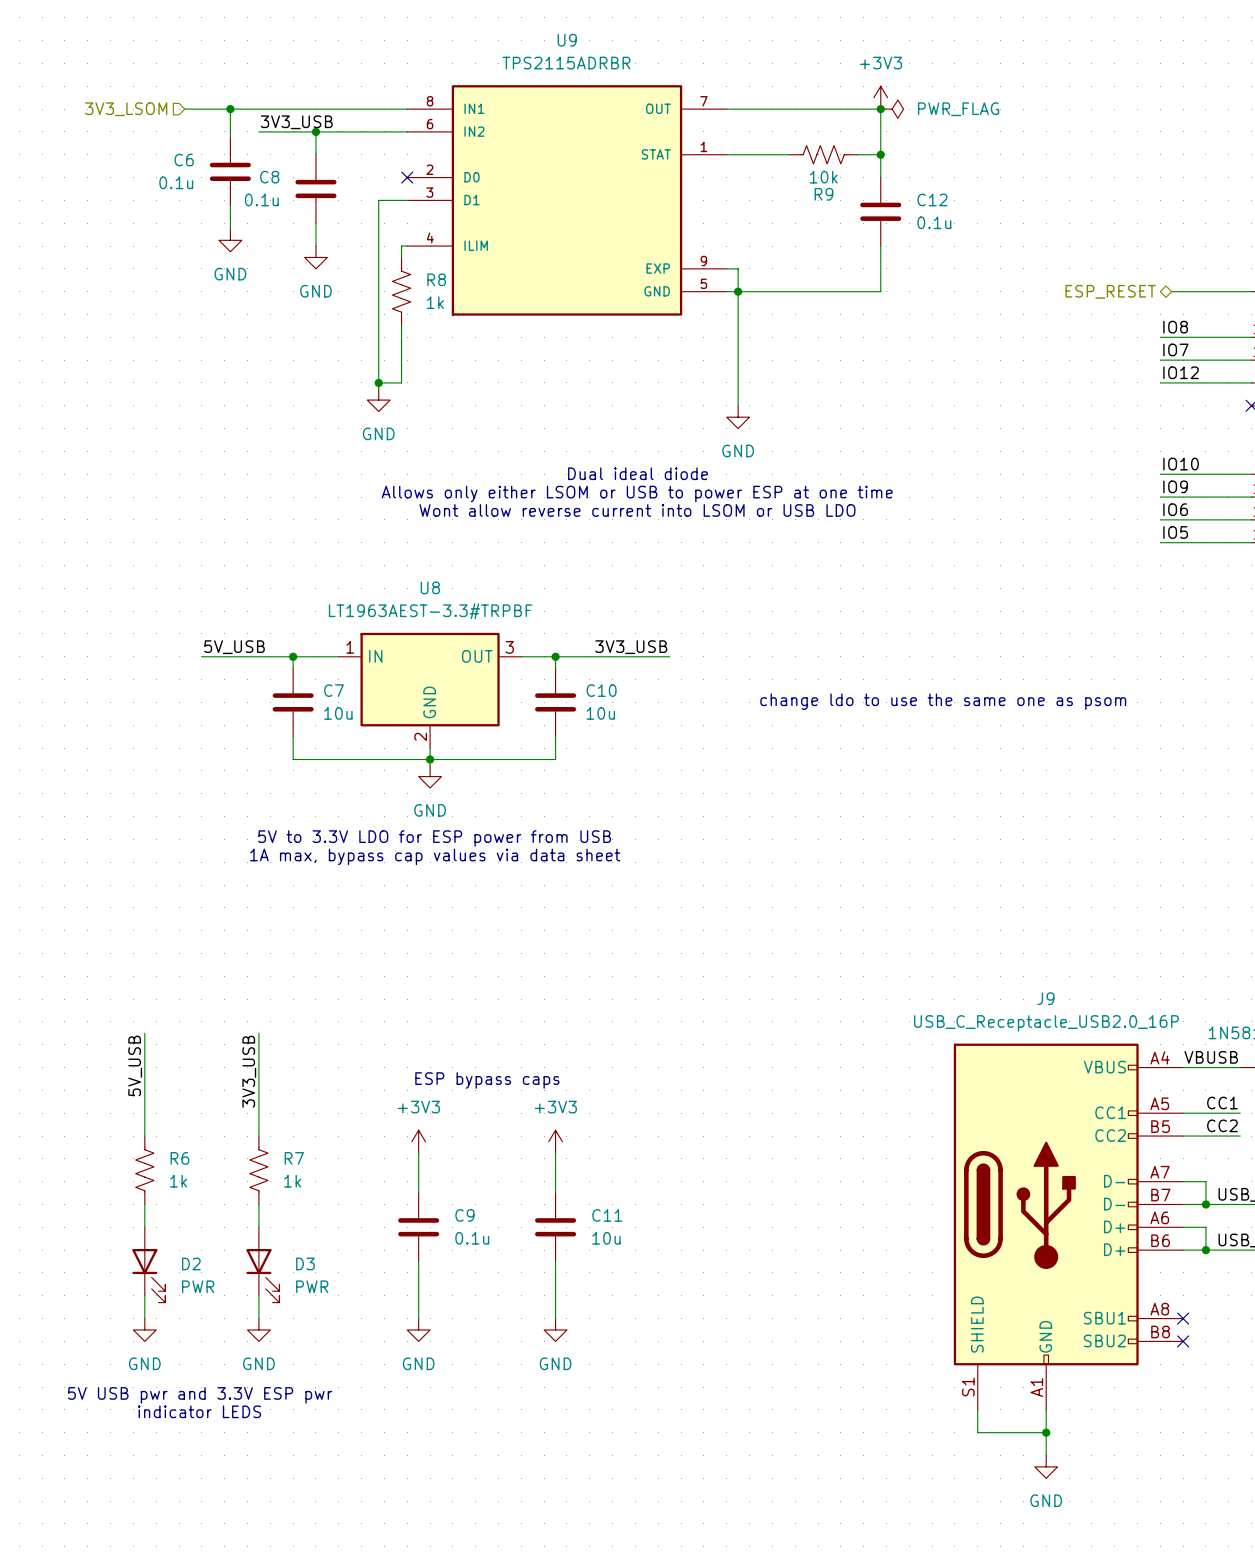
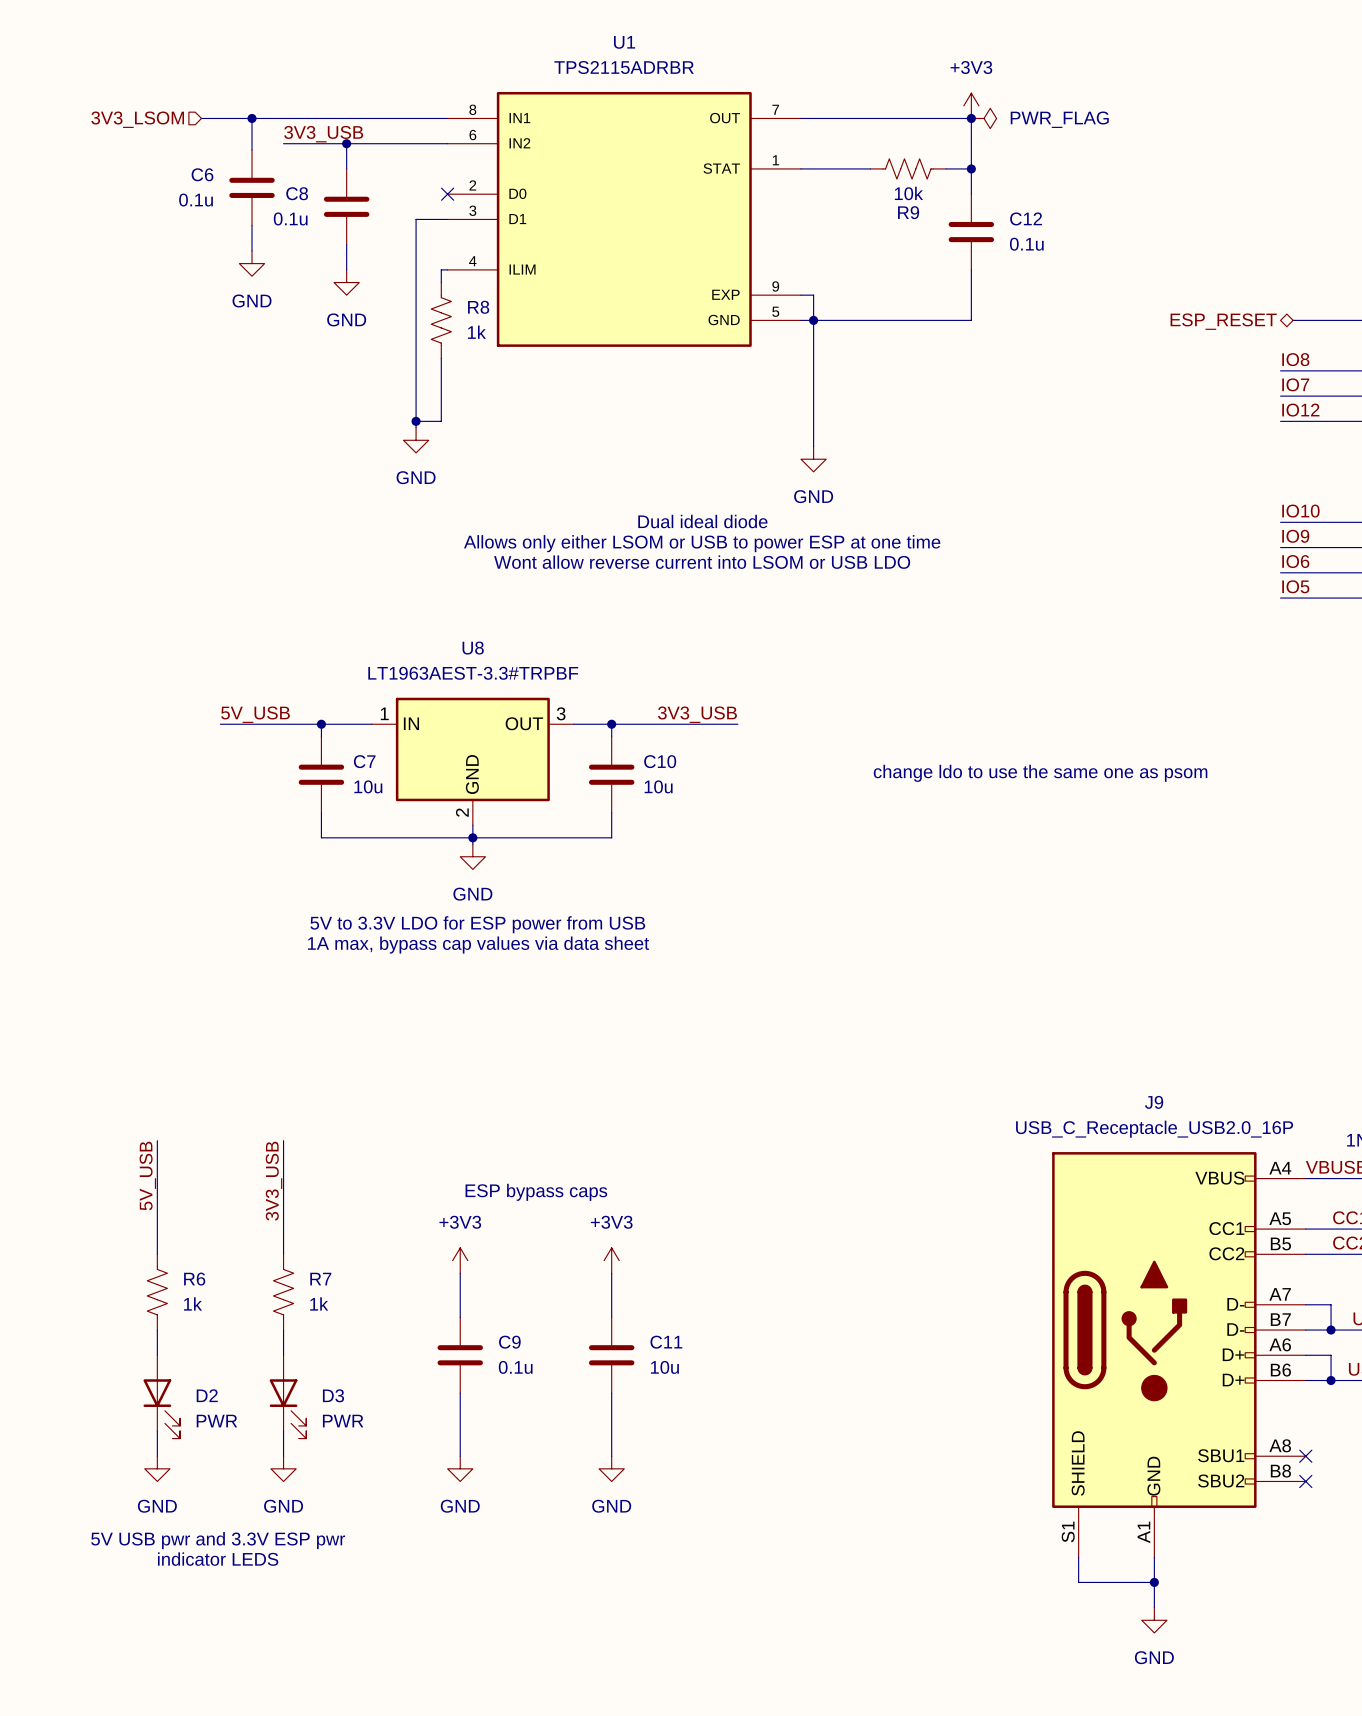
U9 name: U9 (567, 40) -> U1 (624, 42)
J9 symbol: [953, 1043, 1184, 1410] -> [1052, 1152, 1306, 1558]

